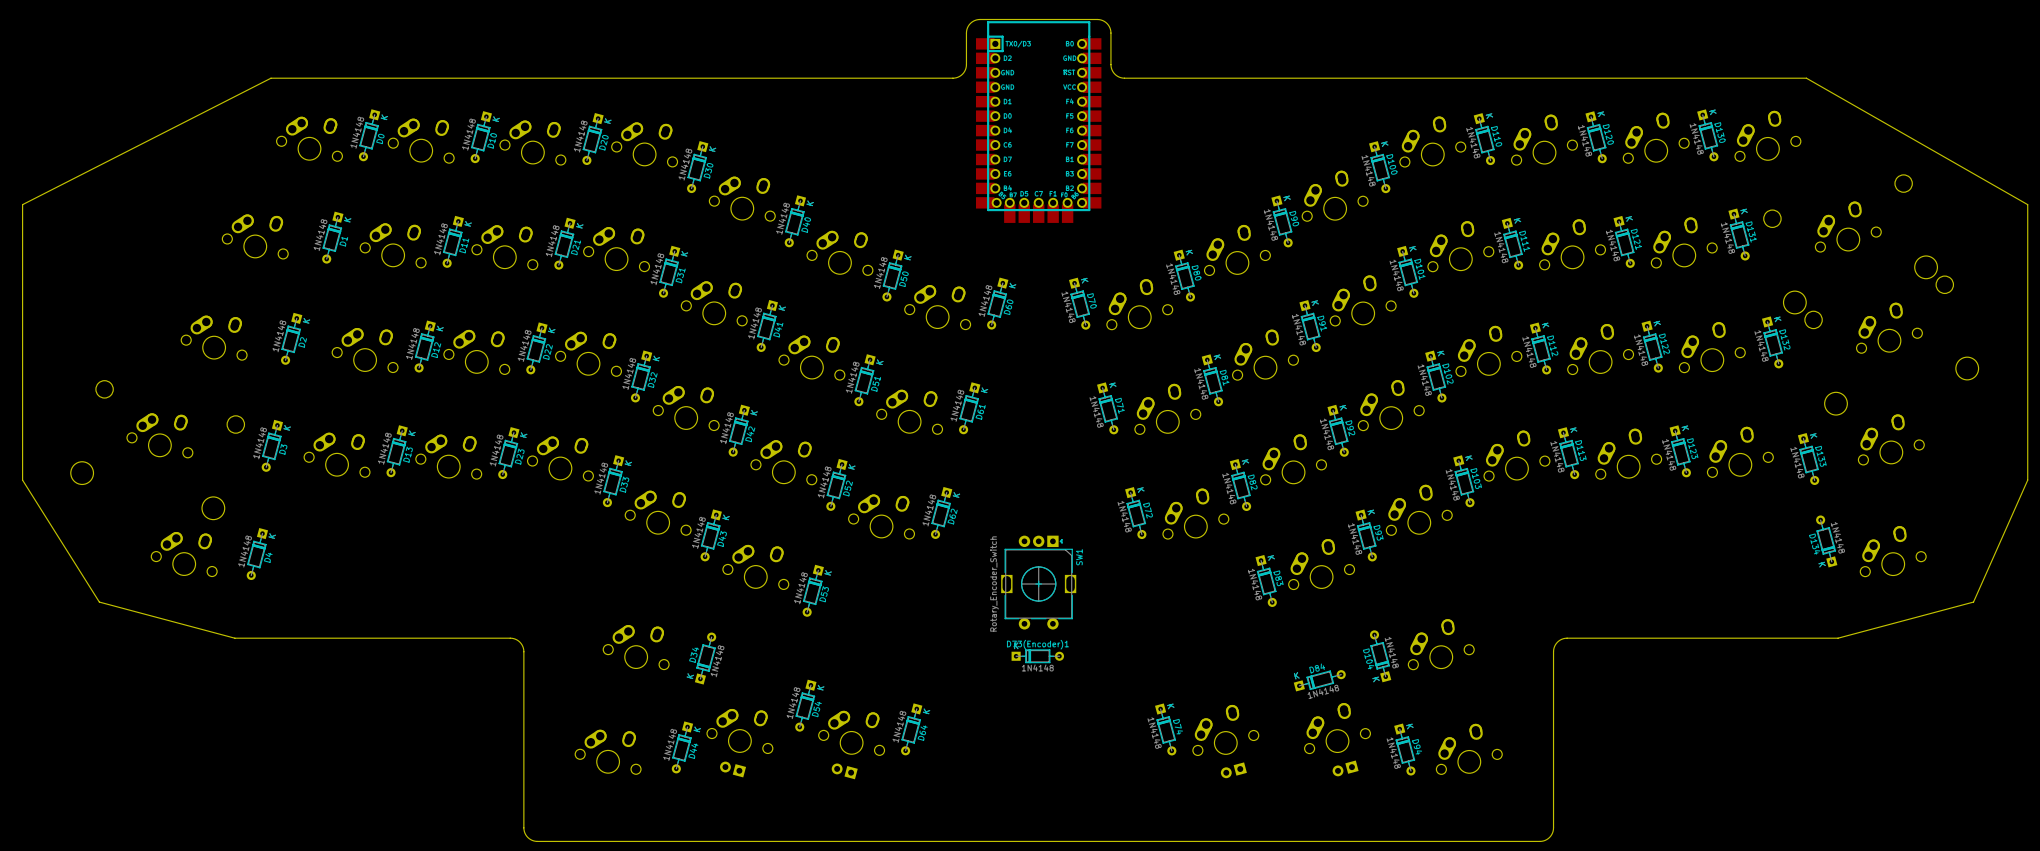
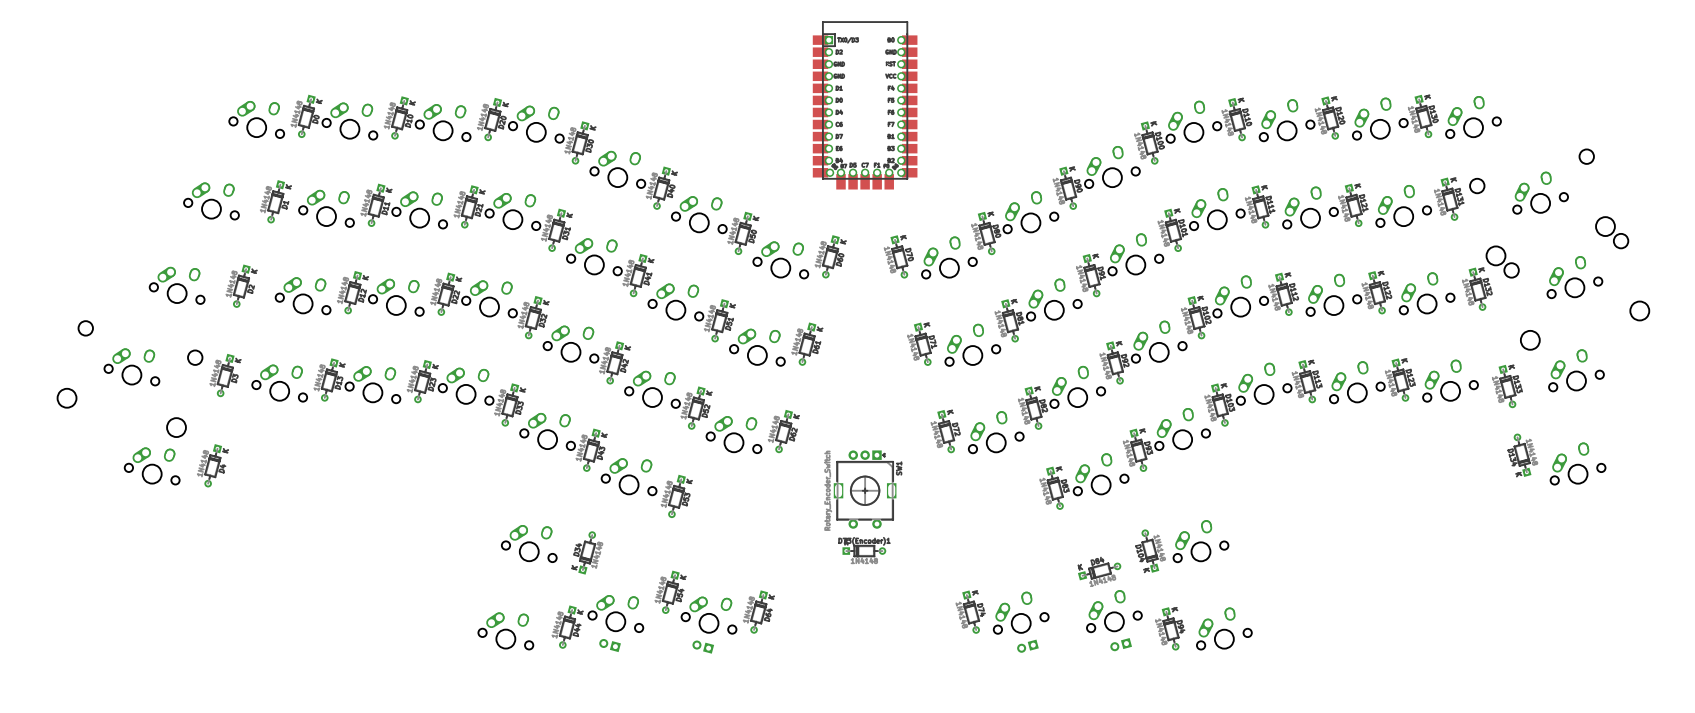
board edge: (1124, 78) (1806, 78) (2027, 204) (2027, 480) (1973, 602) (1838, 638) (1567, 638) (1560, 640) (1555, 644) (1553, 651) (1553, 829) (1549, 837) (1541, 841) (537, 841) (529, 838) (523, 829) (523, 651) (518, 641) (510, 638) (234, 638) (99, 602) (22, 480) (22, 204) (270, 78) (954, 78) (961, 75) (965, 69) (966, 31) (969, 24) (974, 20) (1097, 19) (1105, 22) (1110, 29) (1111, 69) (1116, 75) (1124, 78) -> none

